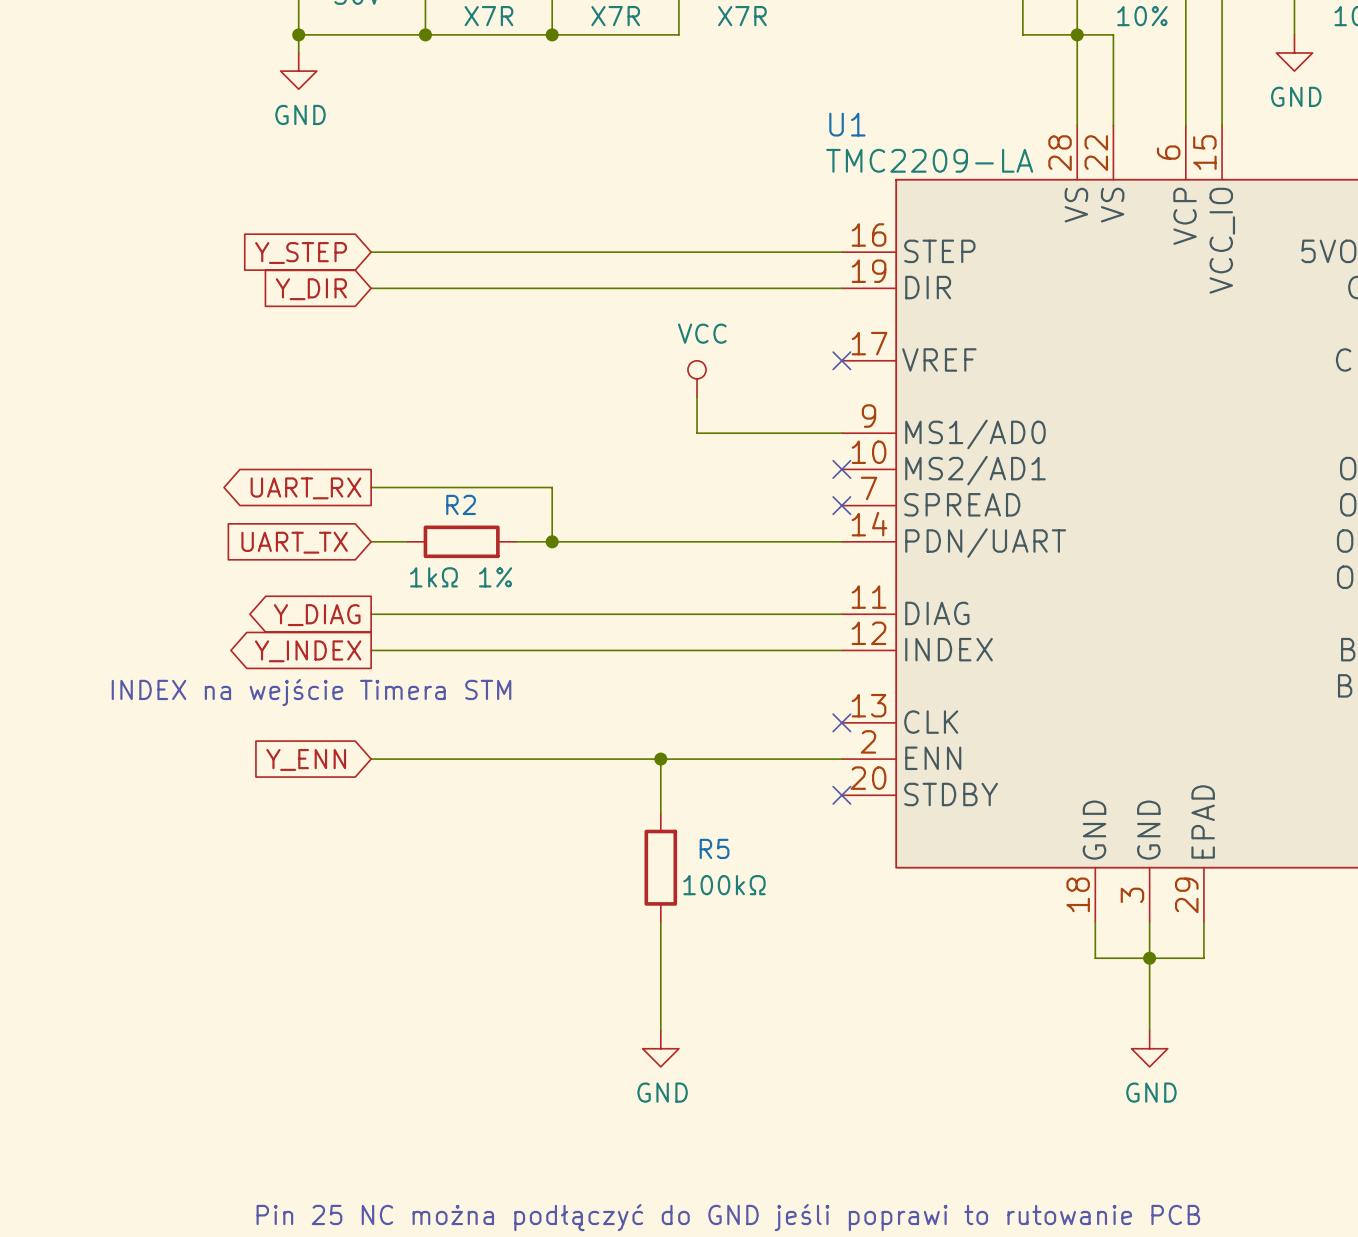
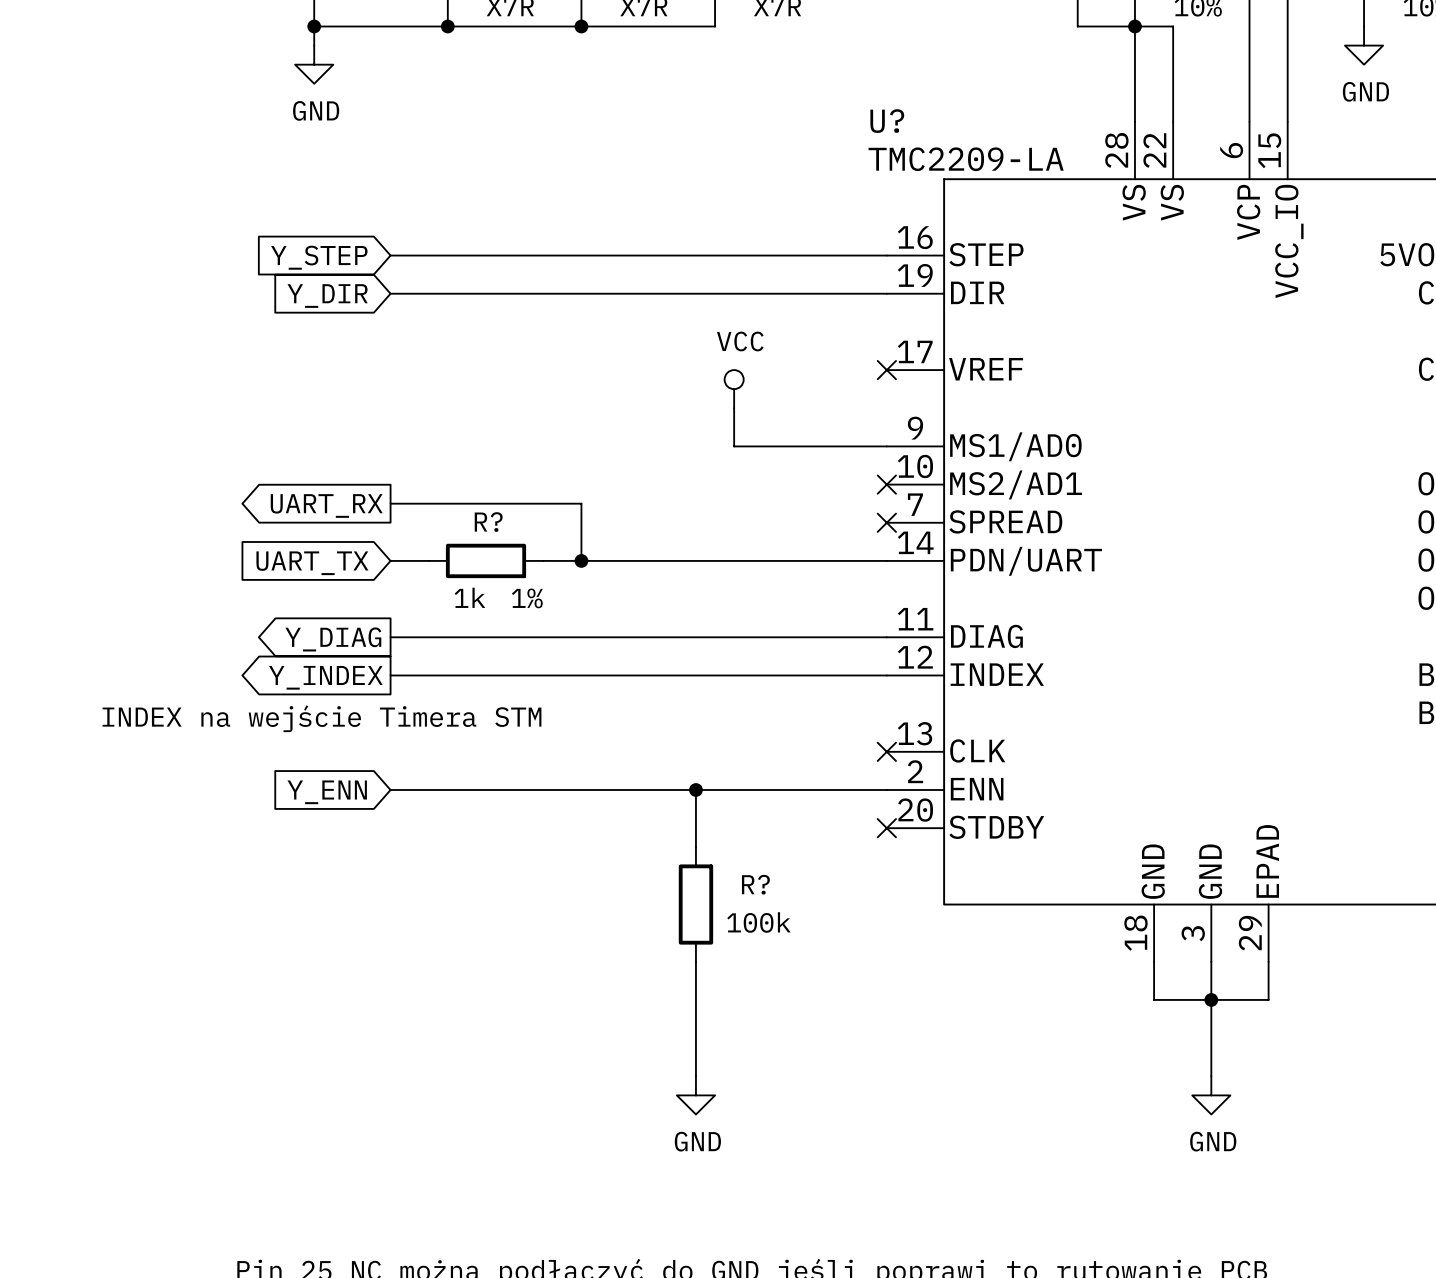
U1 name: U1 (847, 124) -> U? (887, 121)
R2 name: R2 (461, 504) -> R? (488, 522)
R2 value: 1kΩ (433, 577) -> 1k (469, 597)
R5 name: R5 (714, 848) -> R? (755, 884)
R5 value: 100kΩ (724, 885) -> 100k (758, 922)

